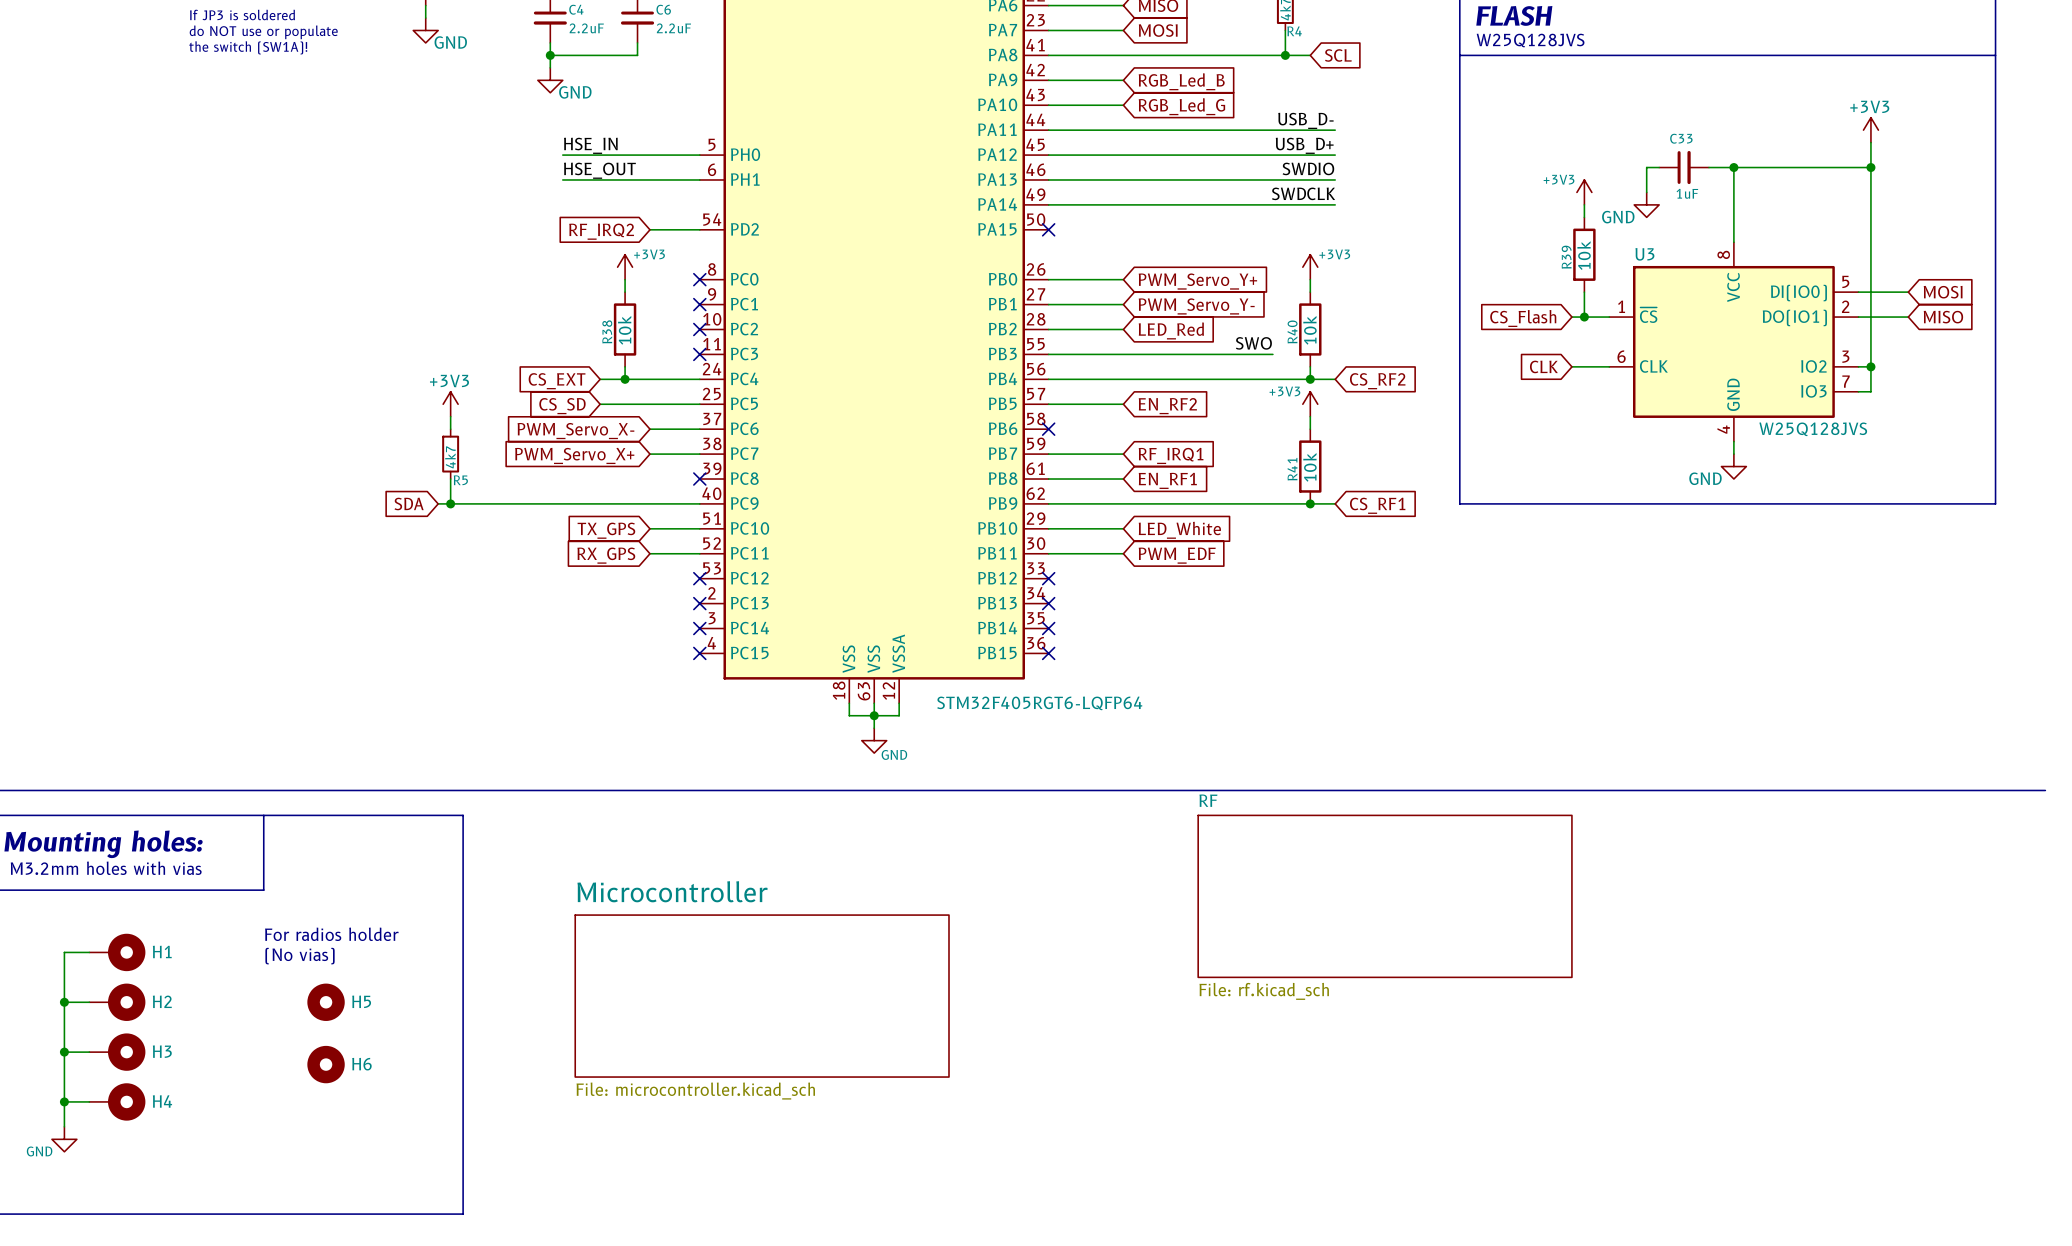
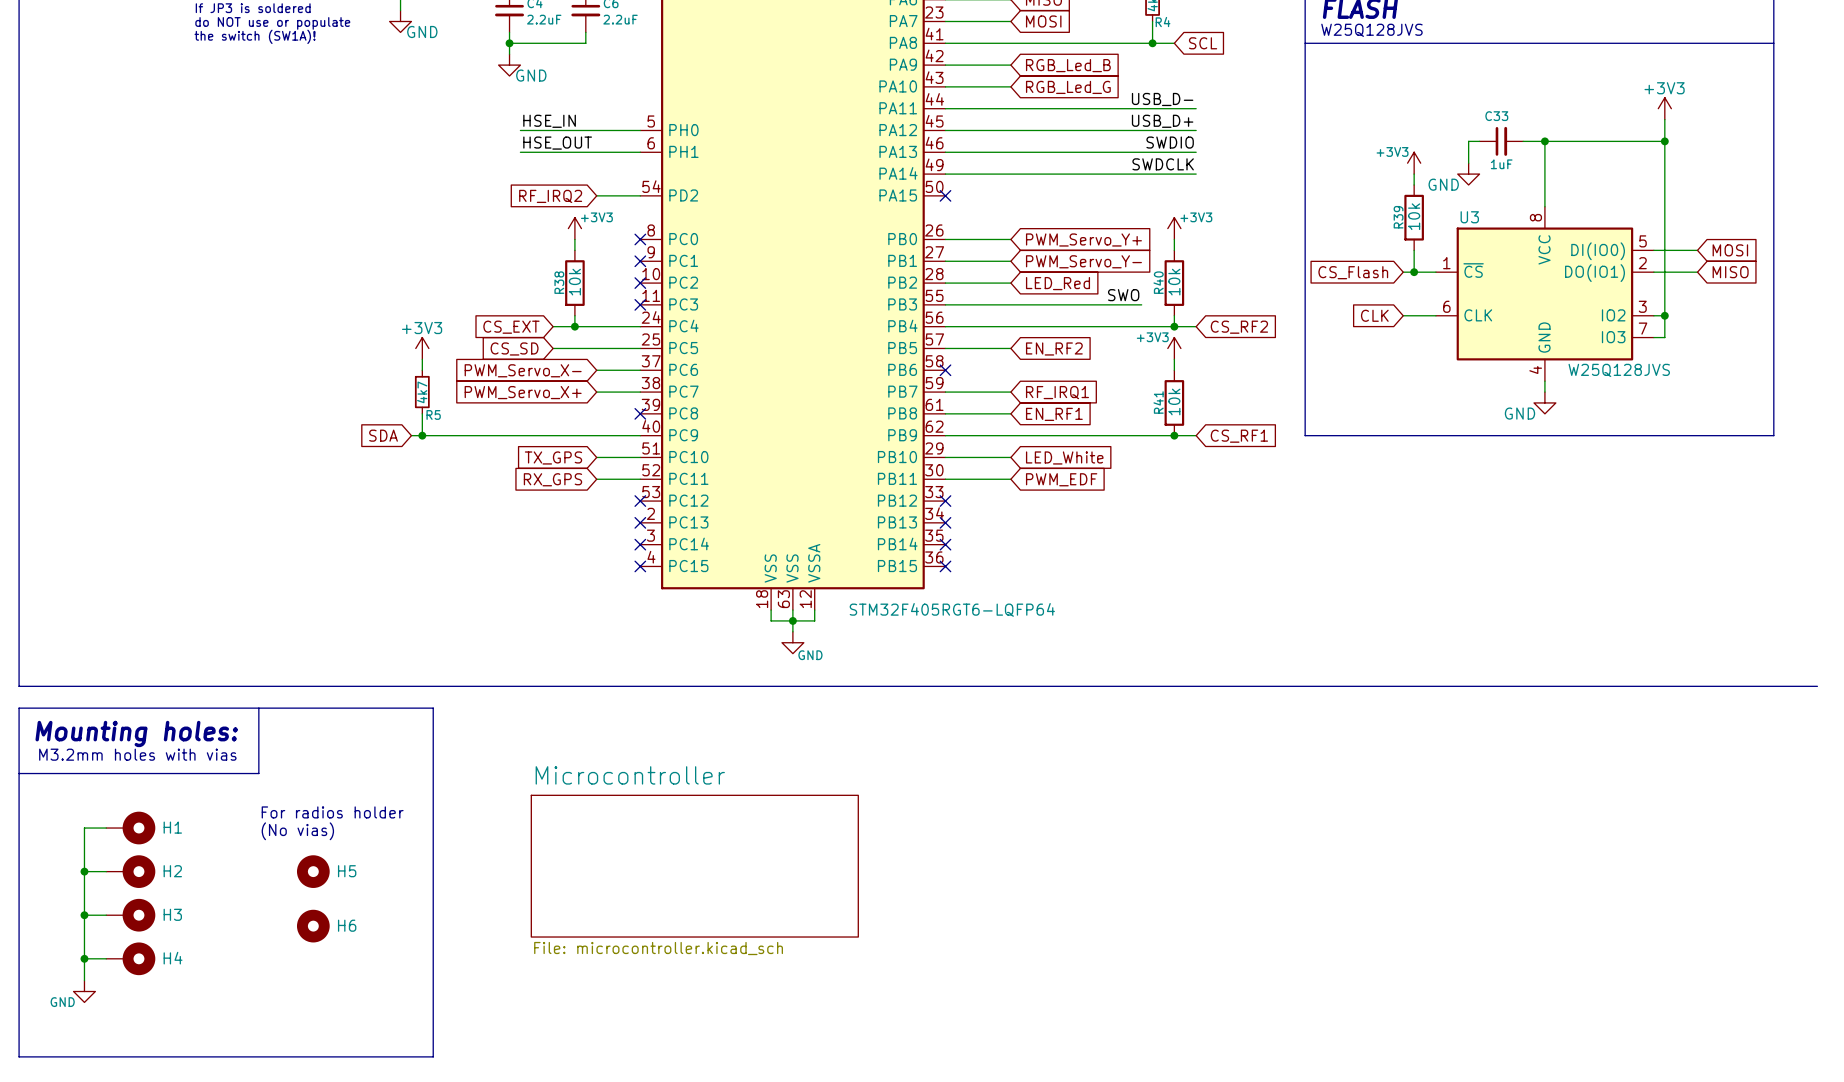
sheet RF: File: rf.kicad_sch (1385, 896) -> none

